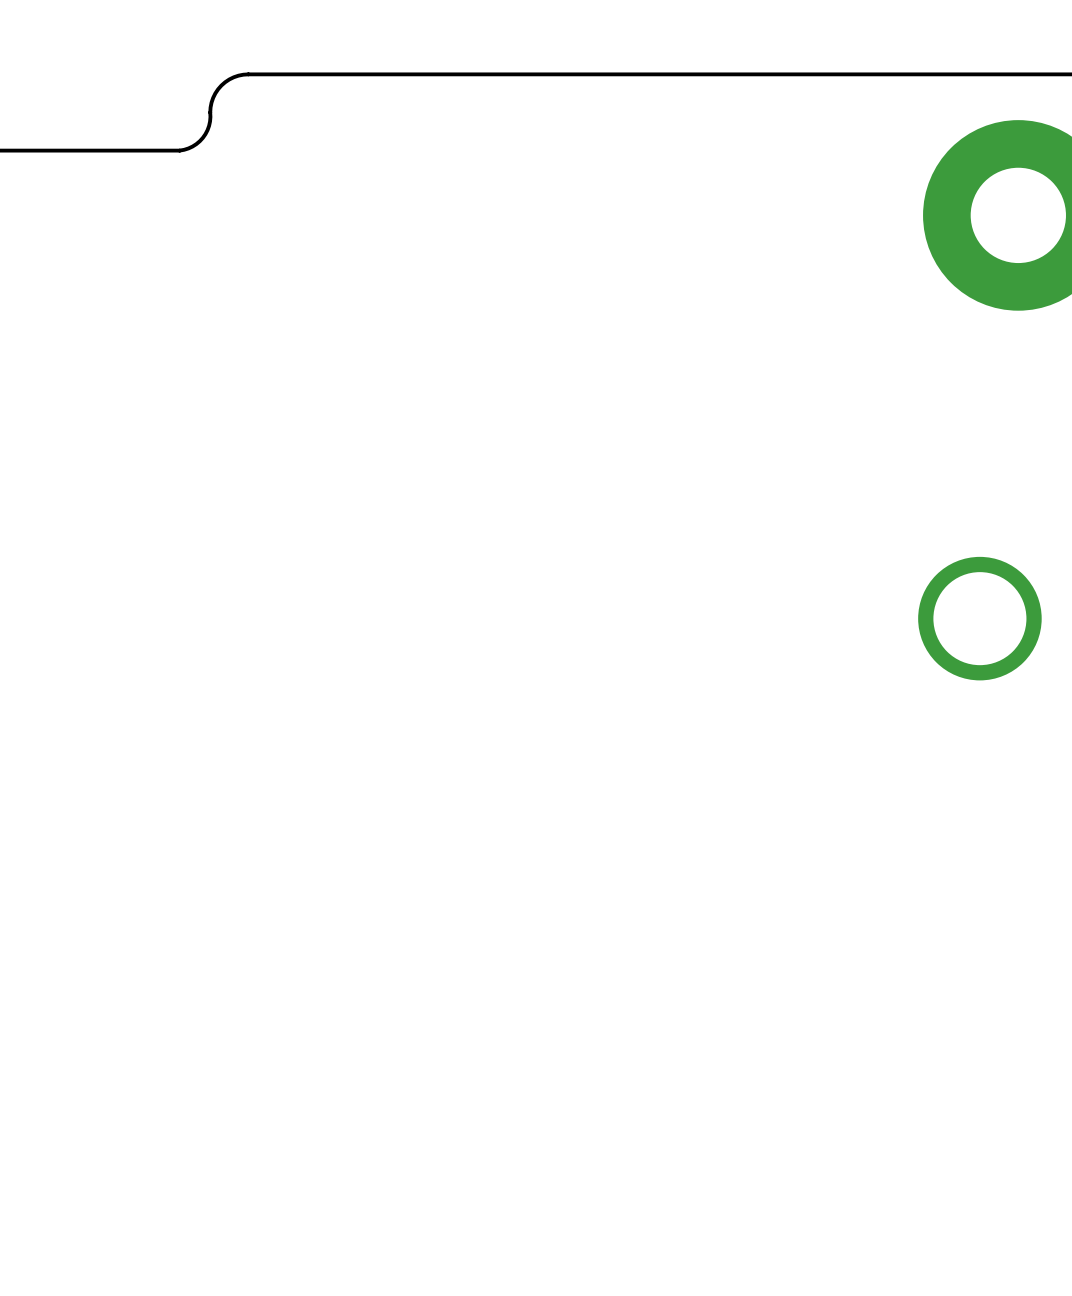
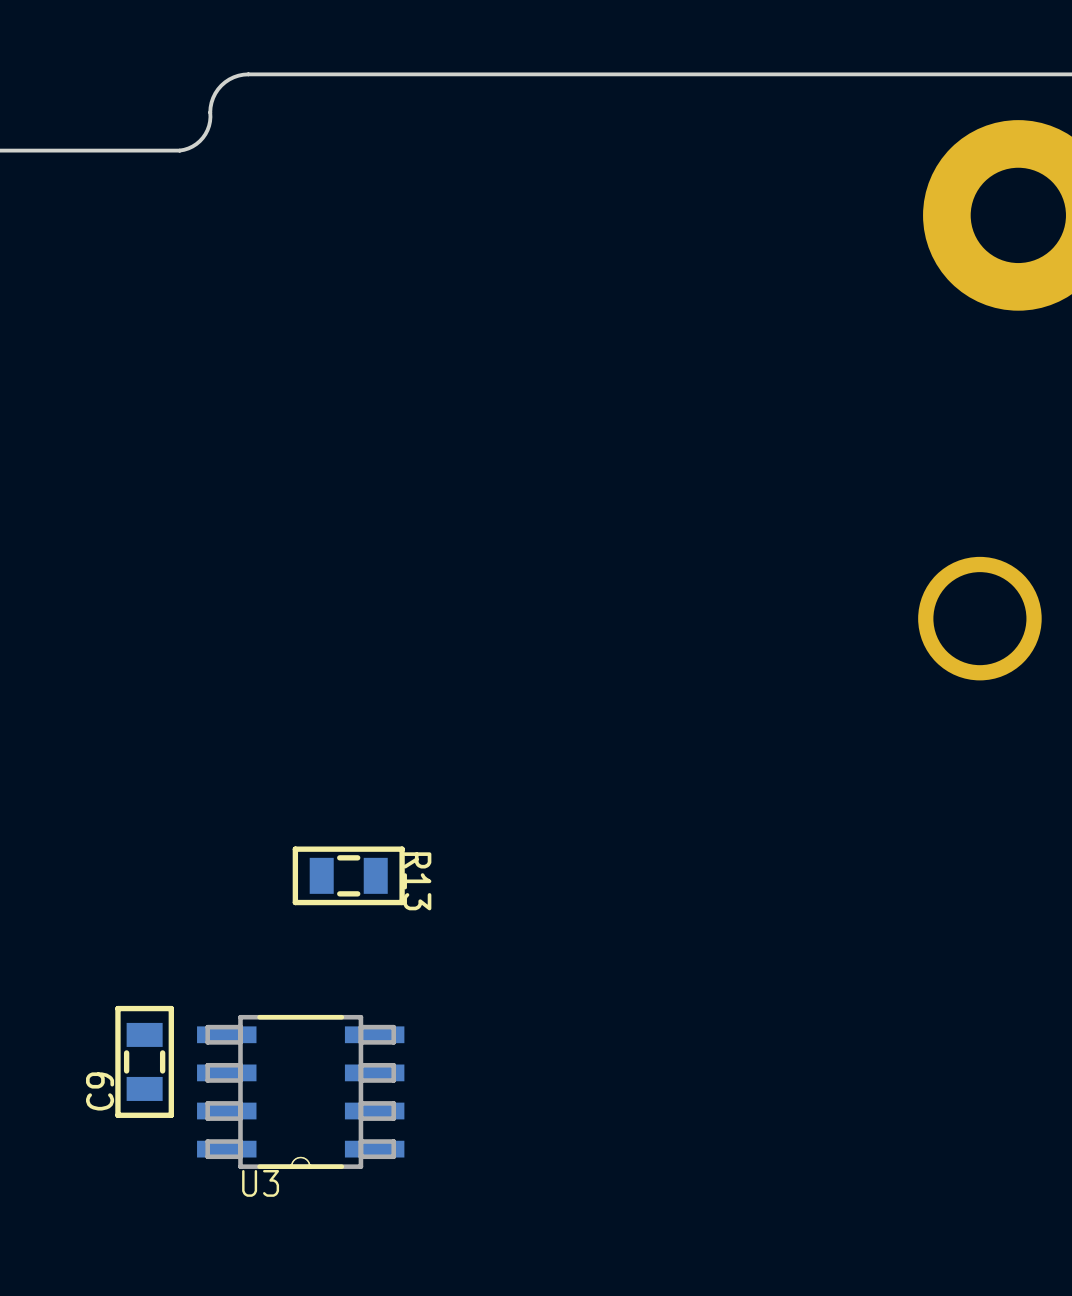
R13: none -> (348, 875)
C9: none -> (144, 1061)
U3: none -> (300, 1091)

